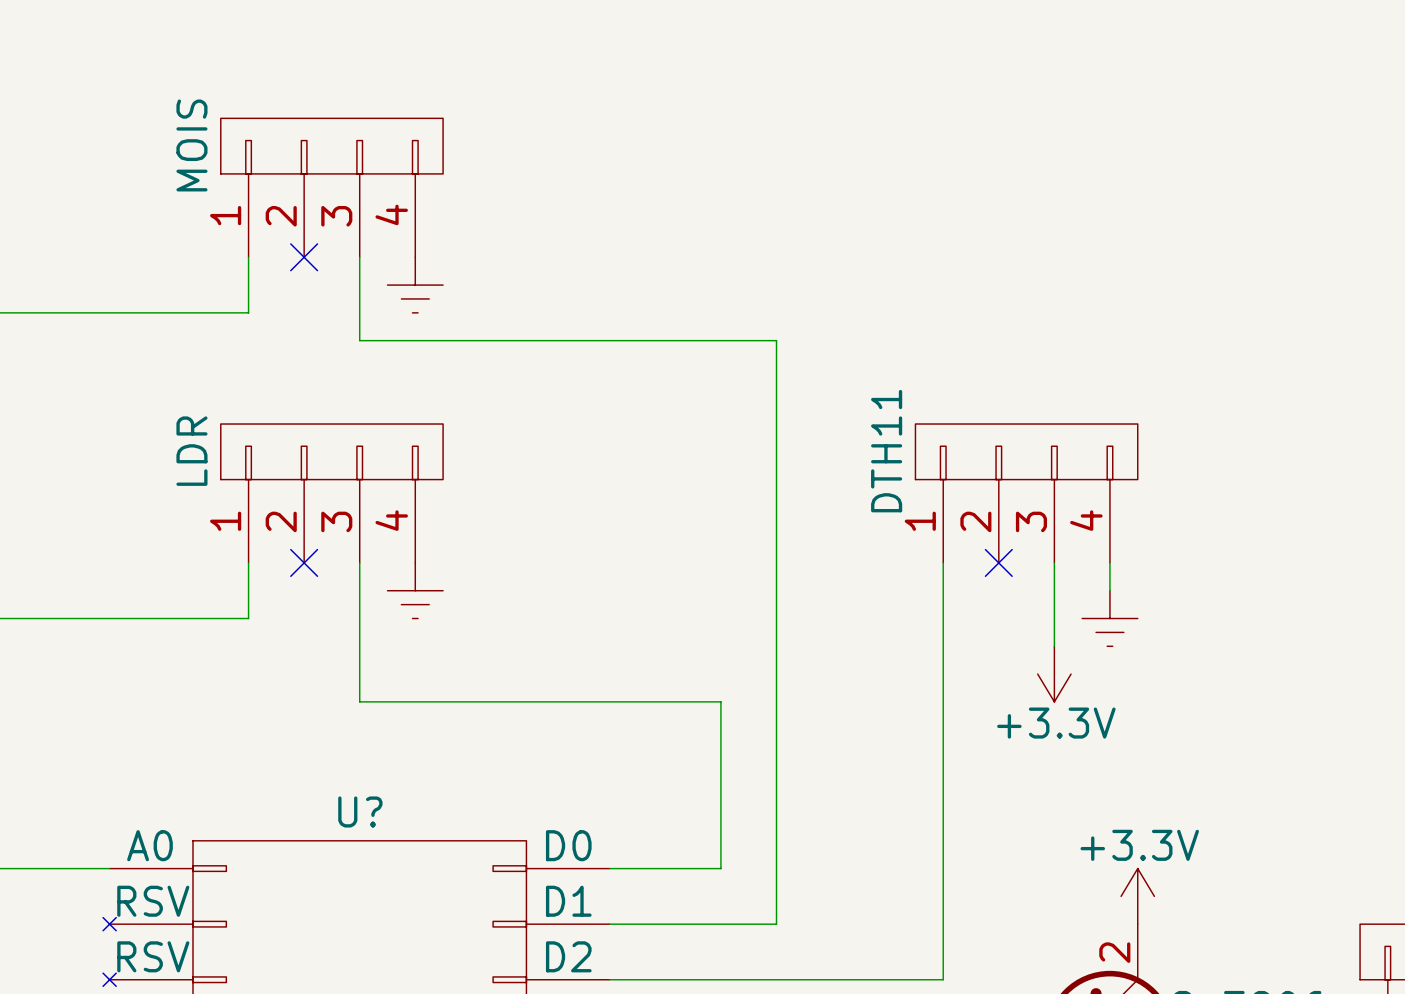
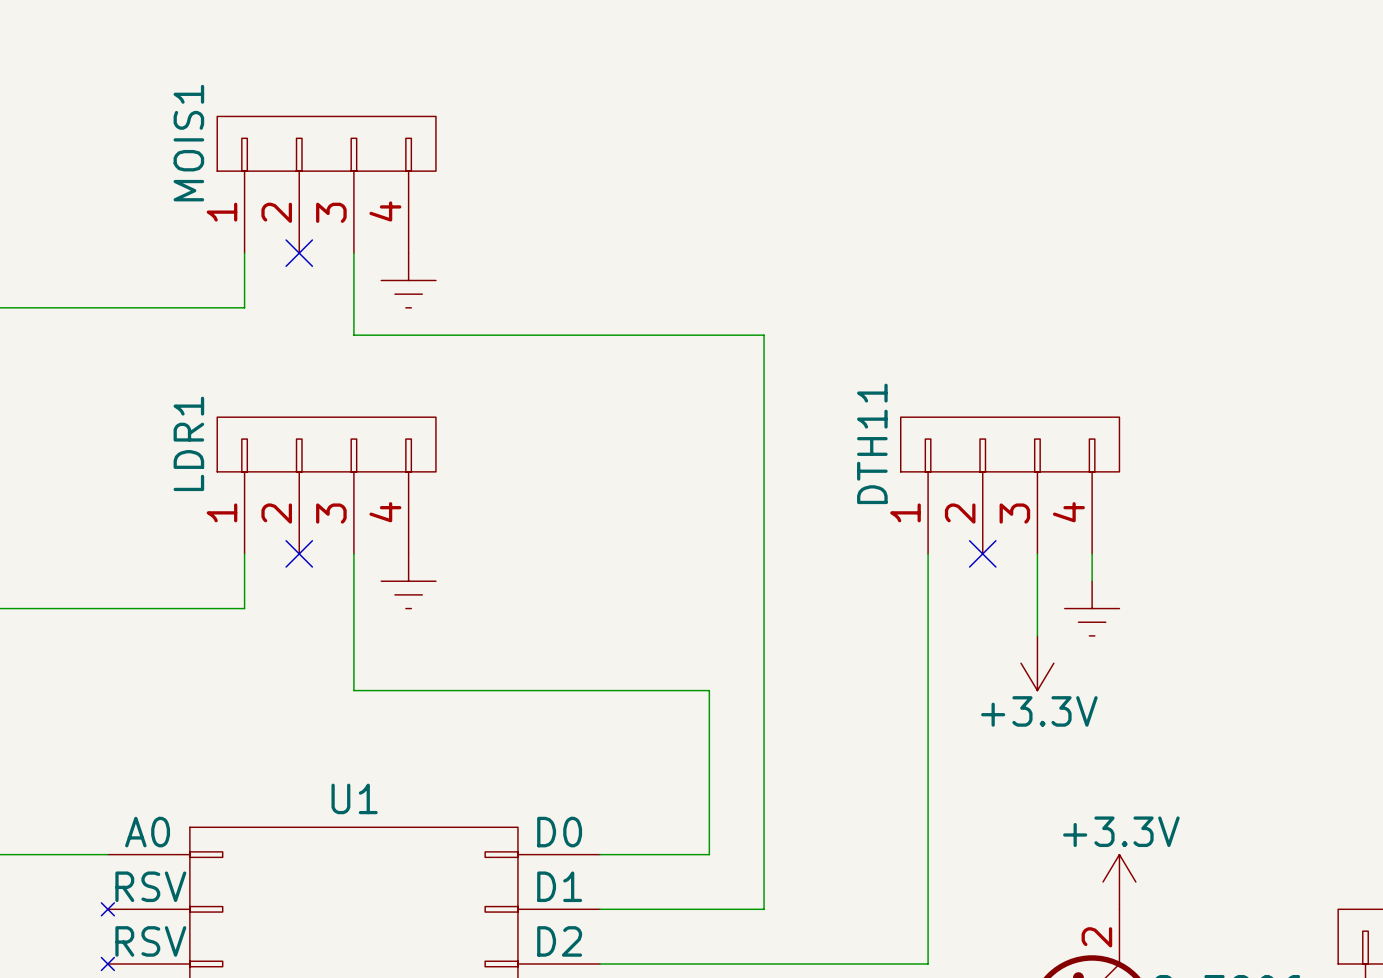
MOIS name: MOIS (191, 145) -> MOIS1 (188, 143)
LDR name: LDR (191, 451) -> LDR1 (188, 443)
U? name: U? (360, 811) -> U1 (354, 798)

